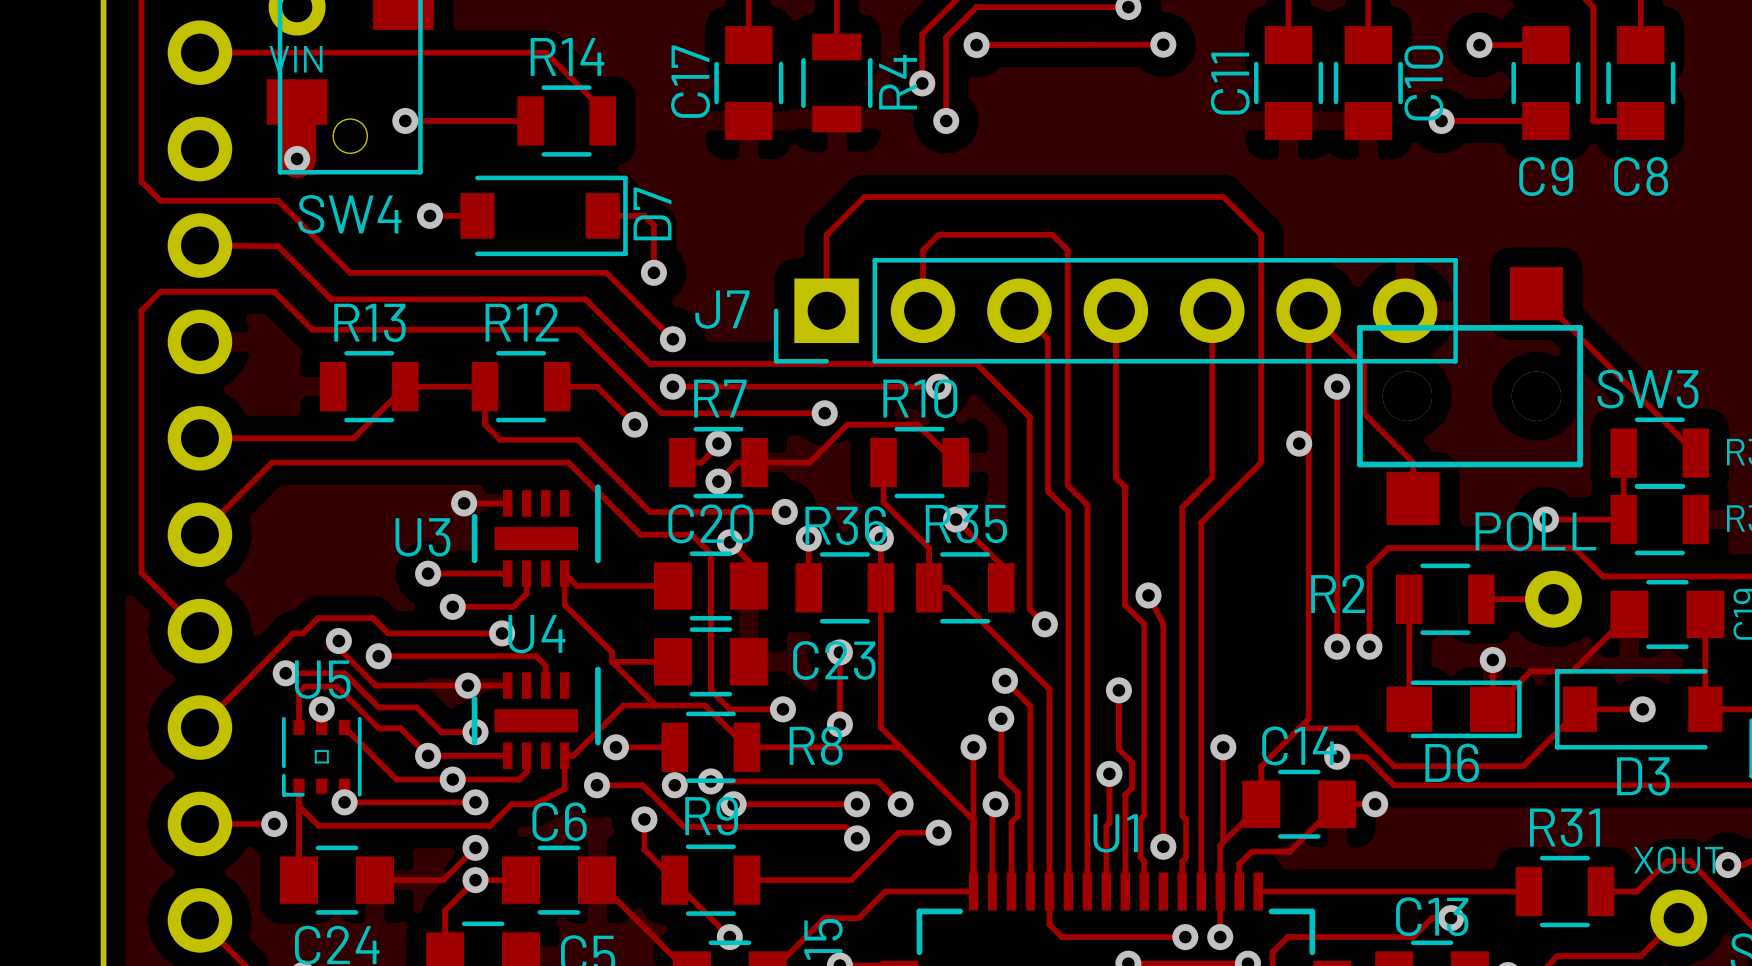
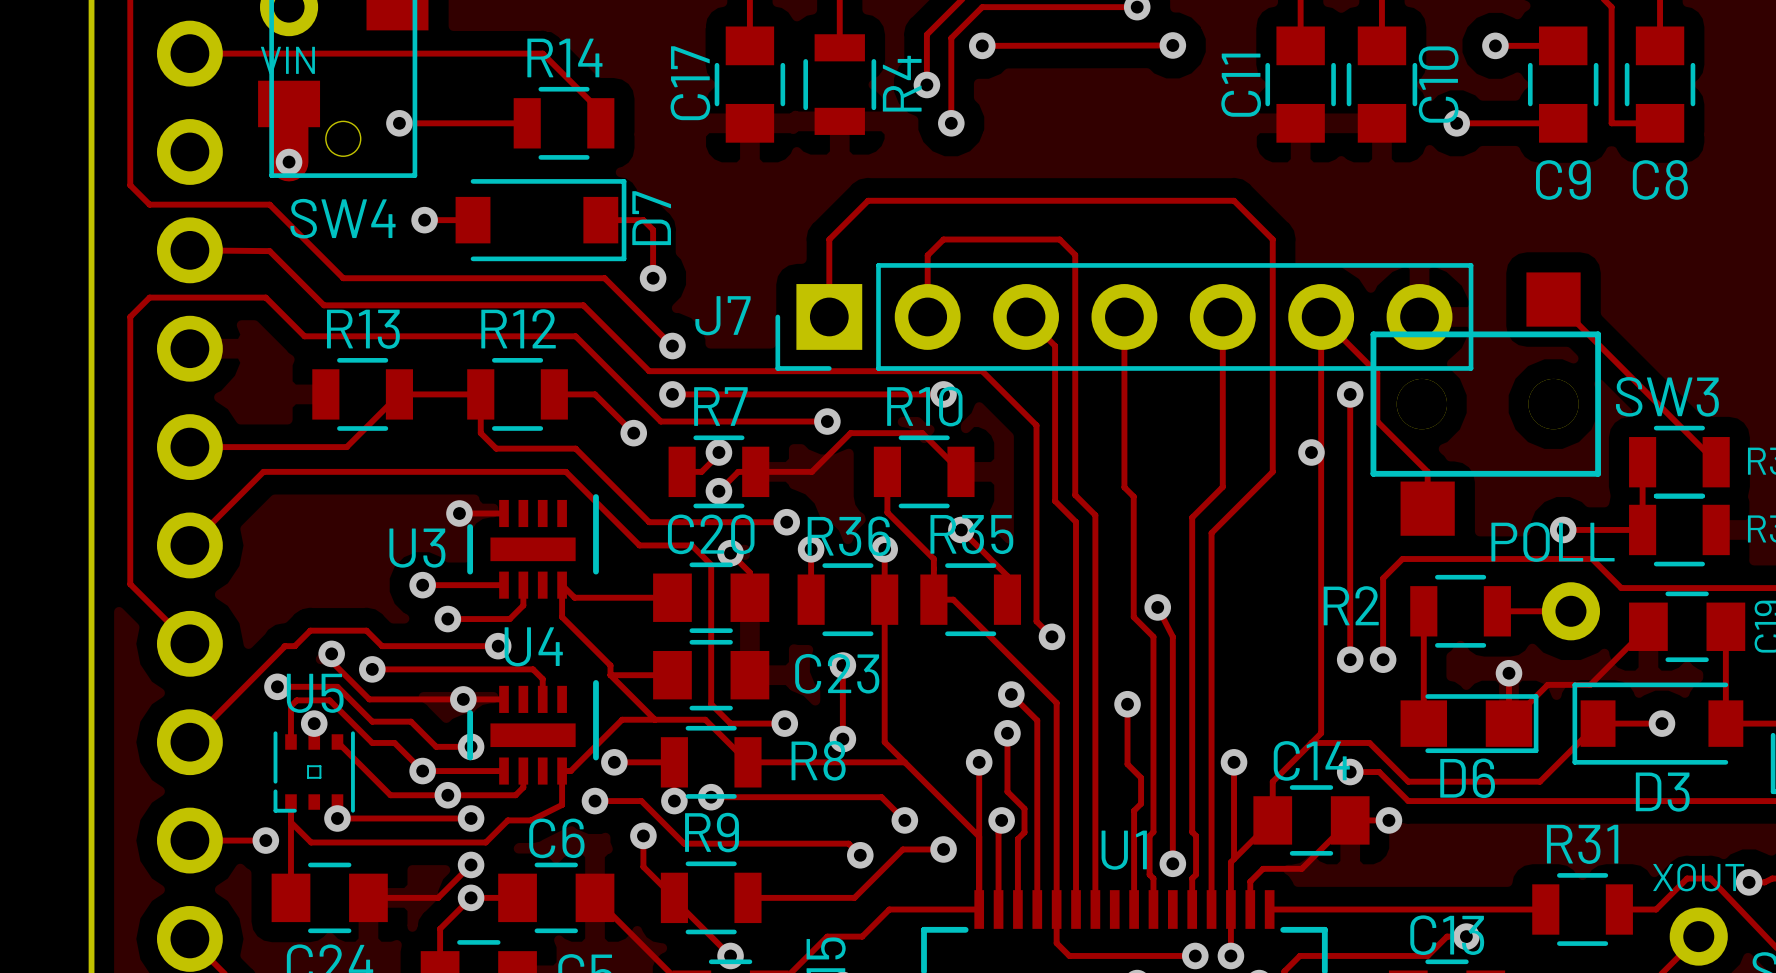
track: (1109, 773) (1109, 823) (1106, 826) (1106, 891) -> none
via: (1109, 773) -> none
track: (733, 804) (856, 804) -> none
via: (733, 804) -> none
via: (856, 804) -> none

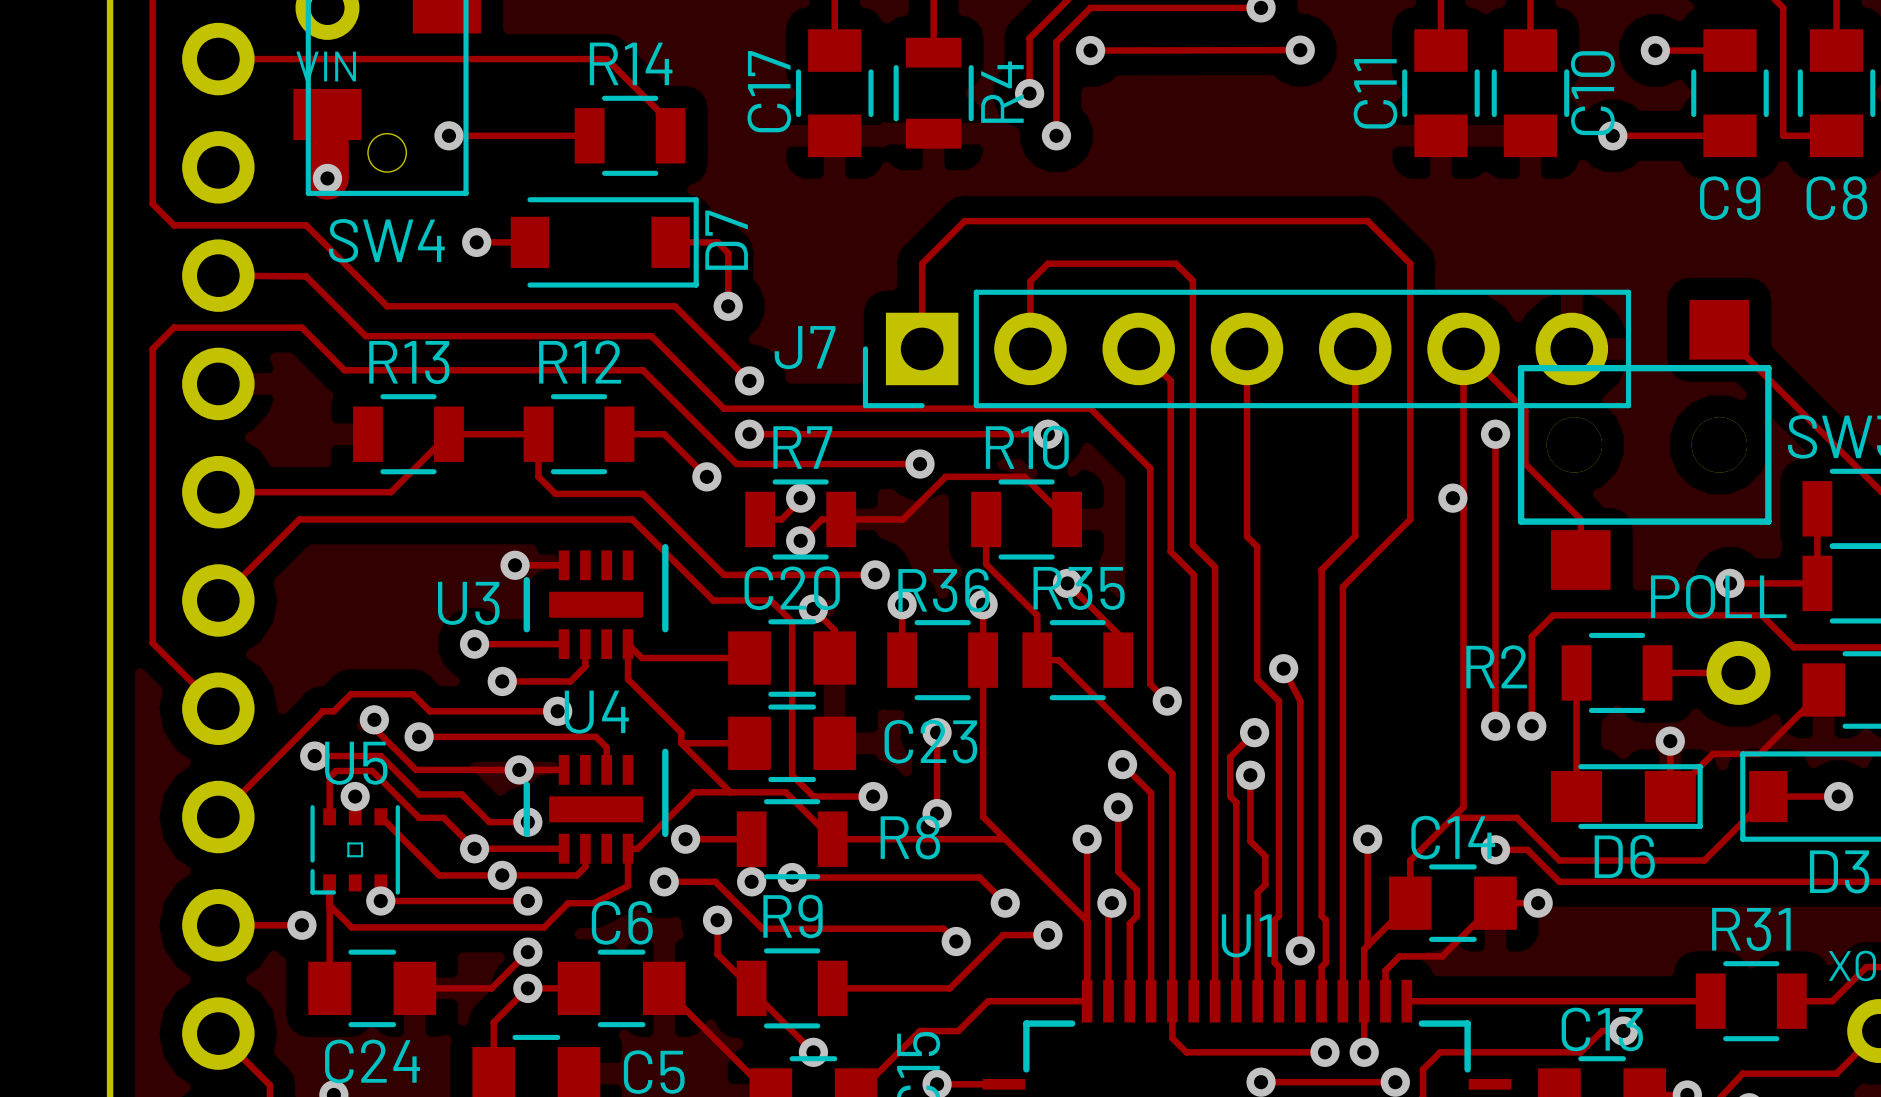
track: none -> (1254, 732) (1230, 756) (1230, 796) (1236, 802) (1236, 1001)
via: none -> (1254, 732)

